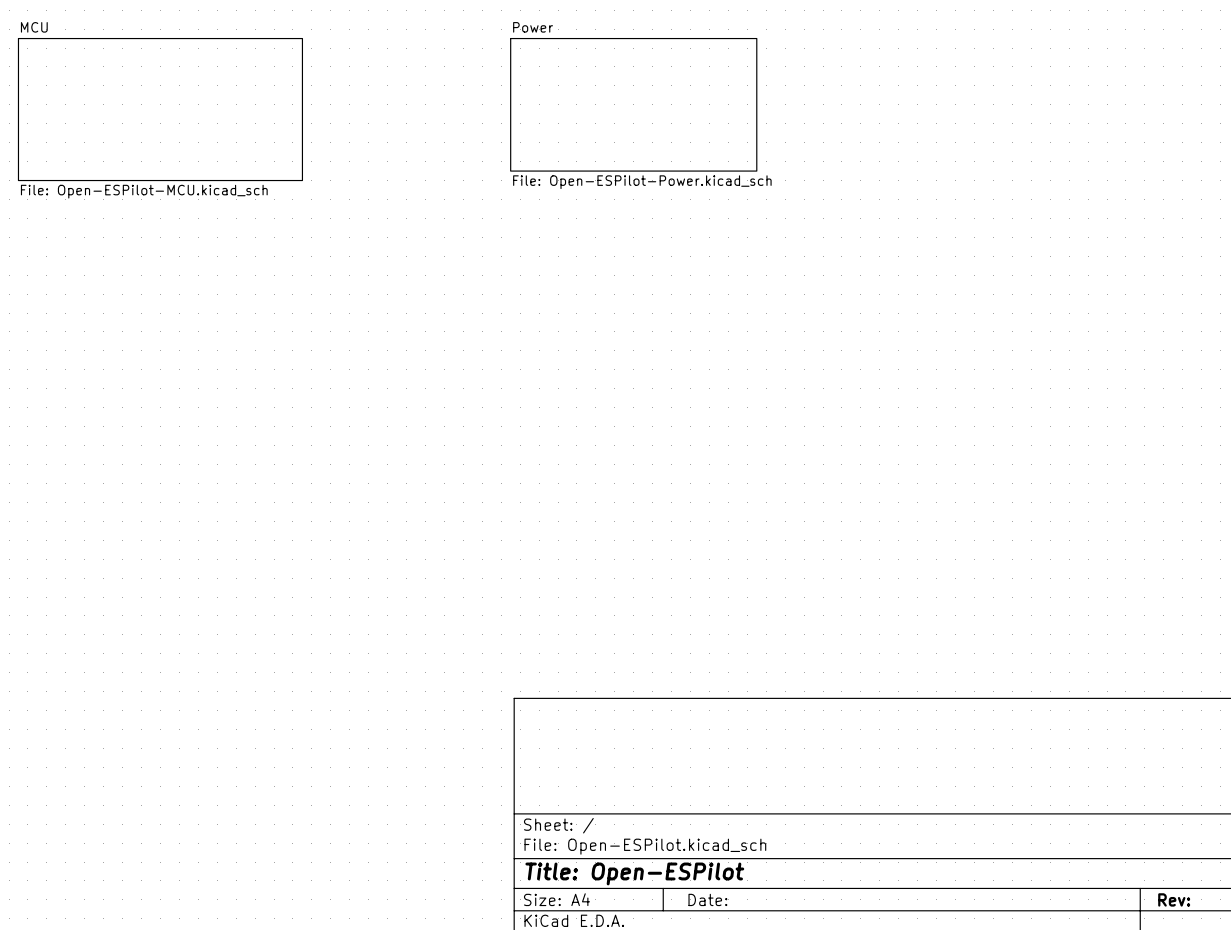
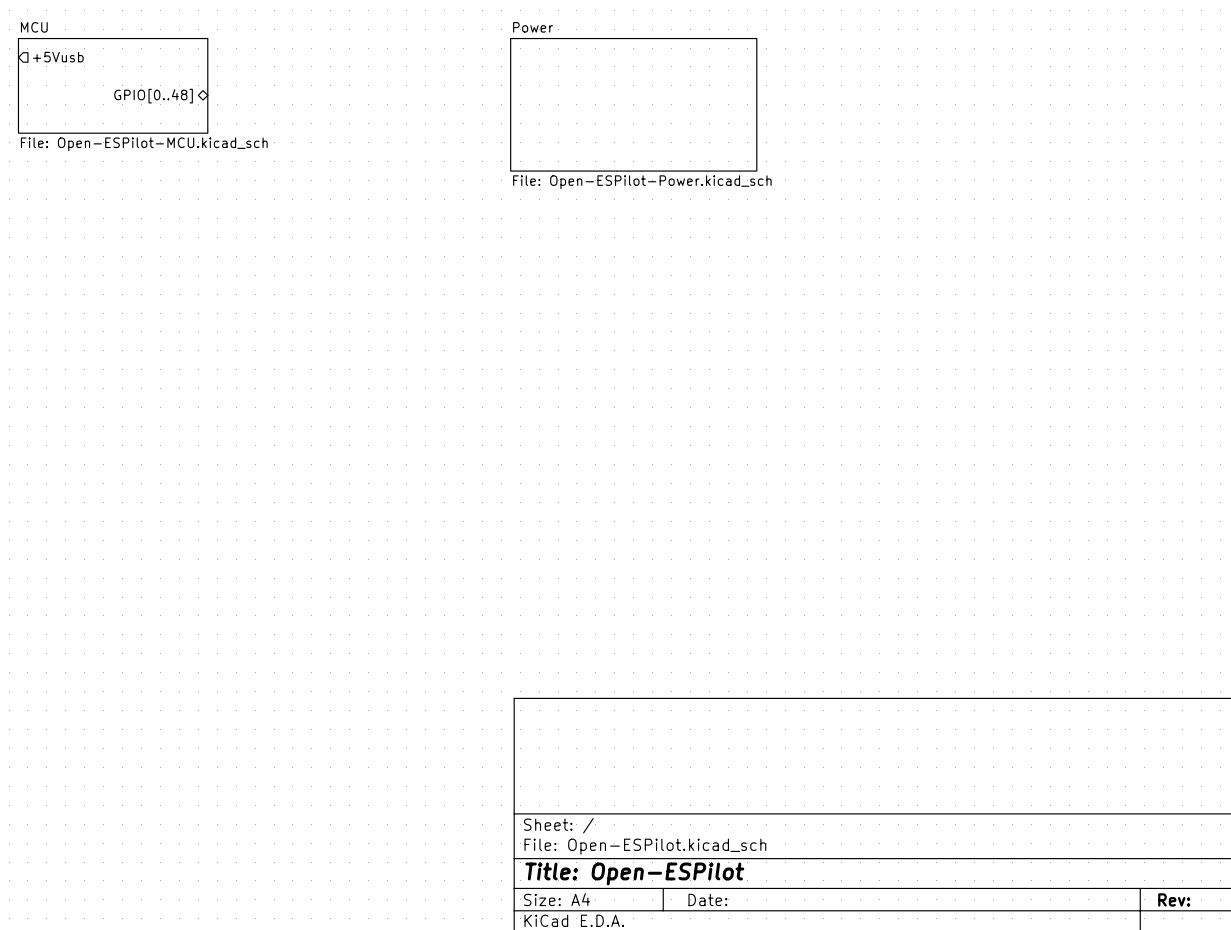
sheet pin: none -> +5Vusb (58, 57)
sheet MCU: none -> File: Open-ESPilot-MCU.kicad_sch (113, 85)
sheet pin: none -> GPIO[0..48] (153, 96)
sheet MCU: File: Open-ESPilot-MCU.kicad_sch (160, 109) -> none

